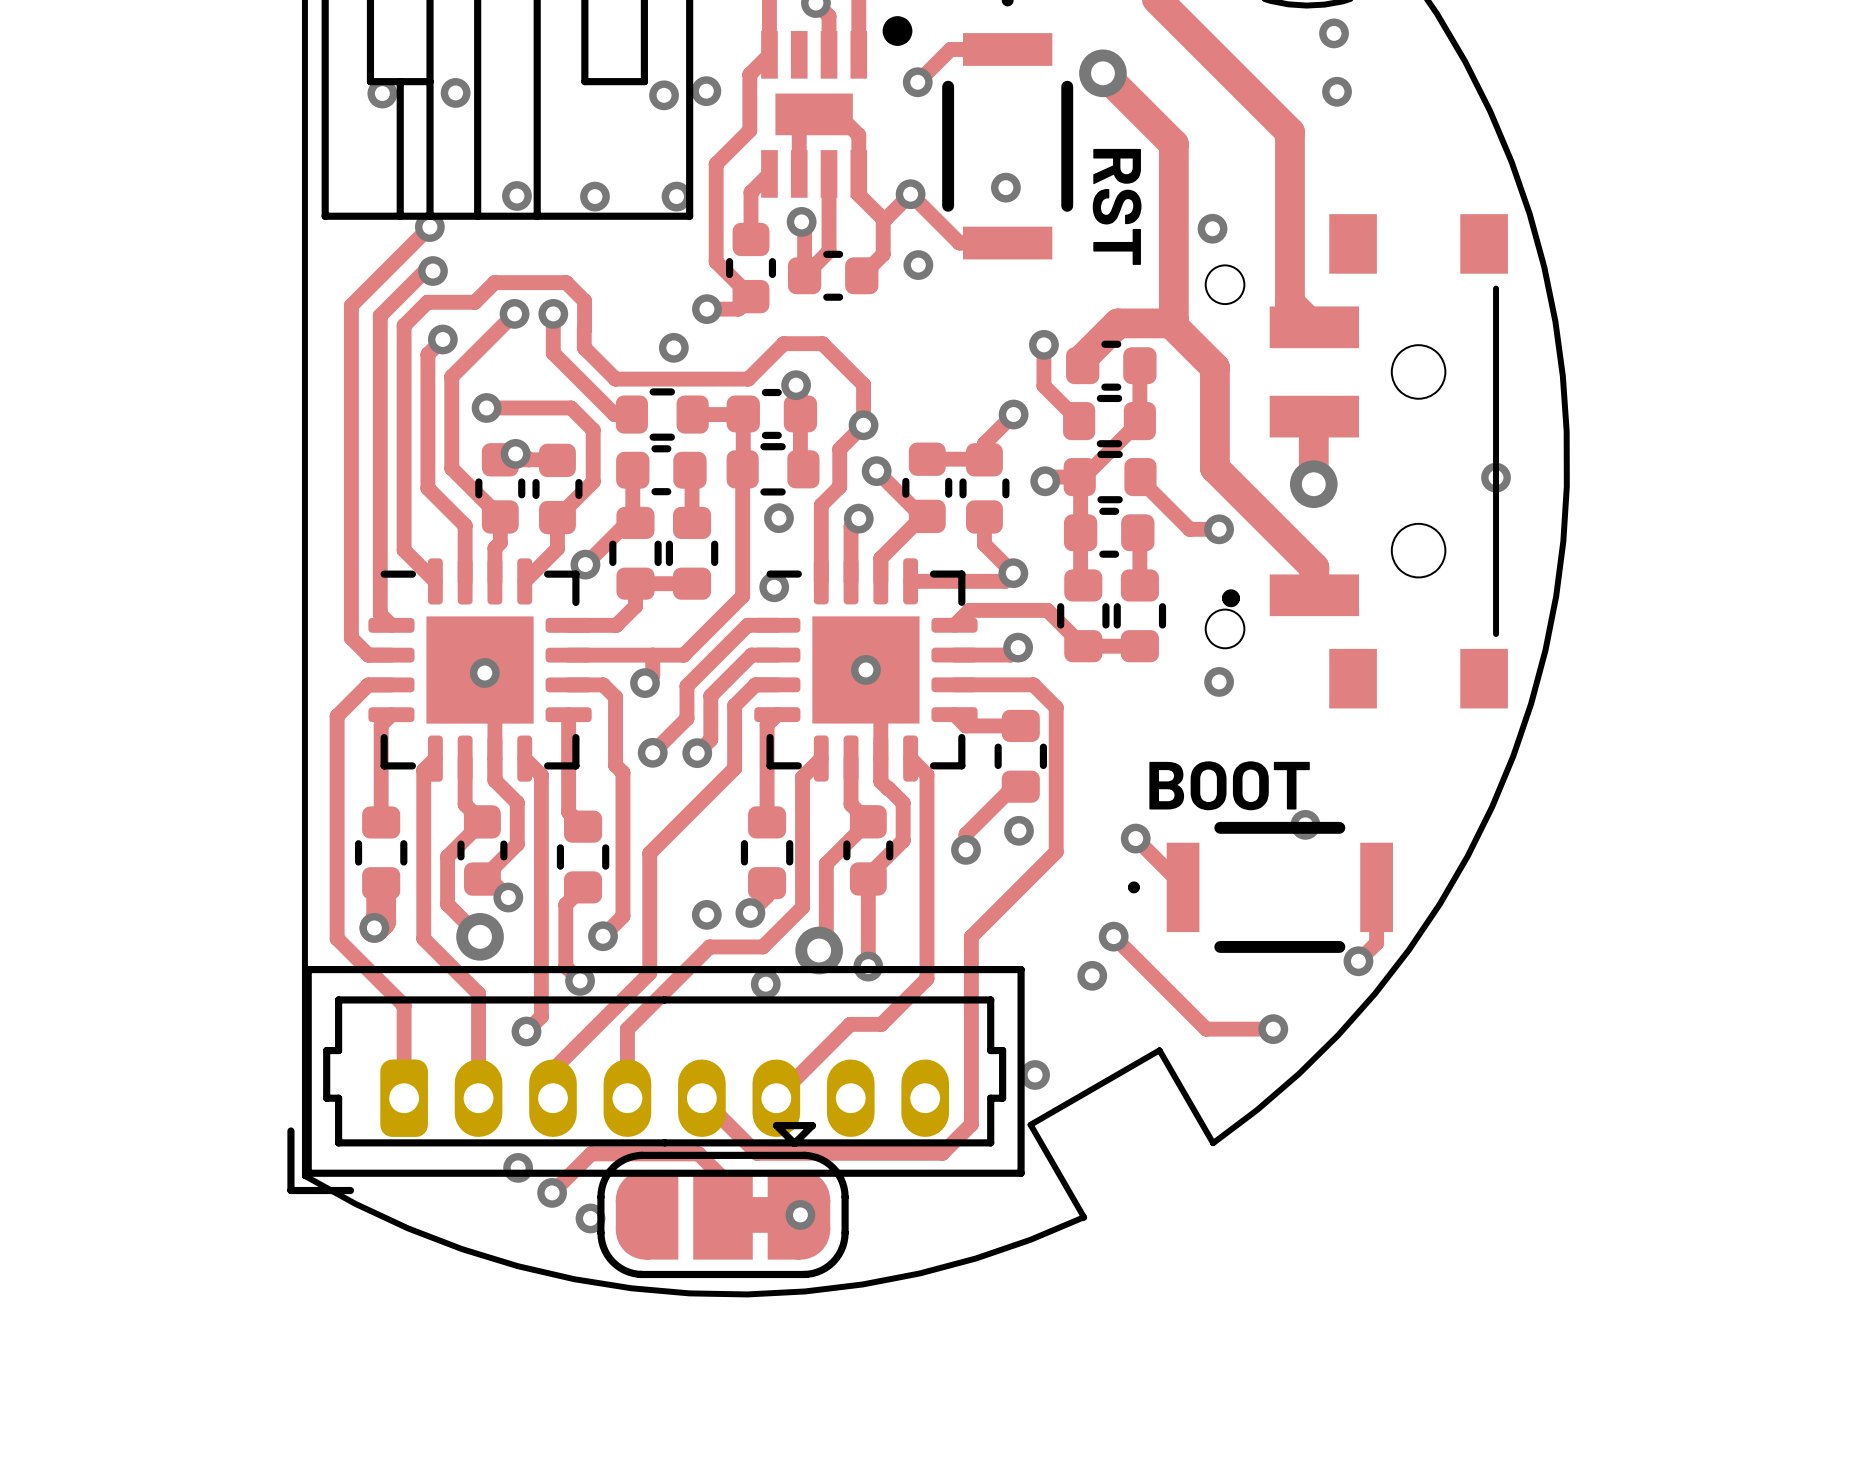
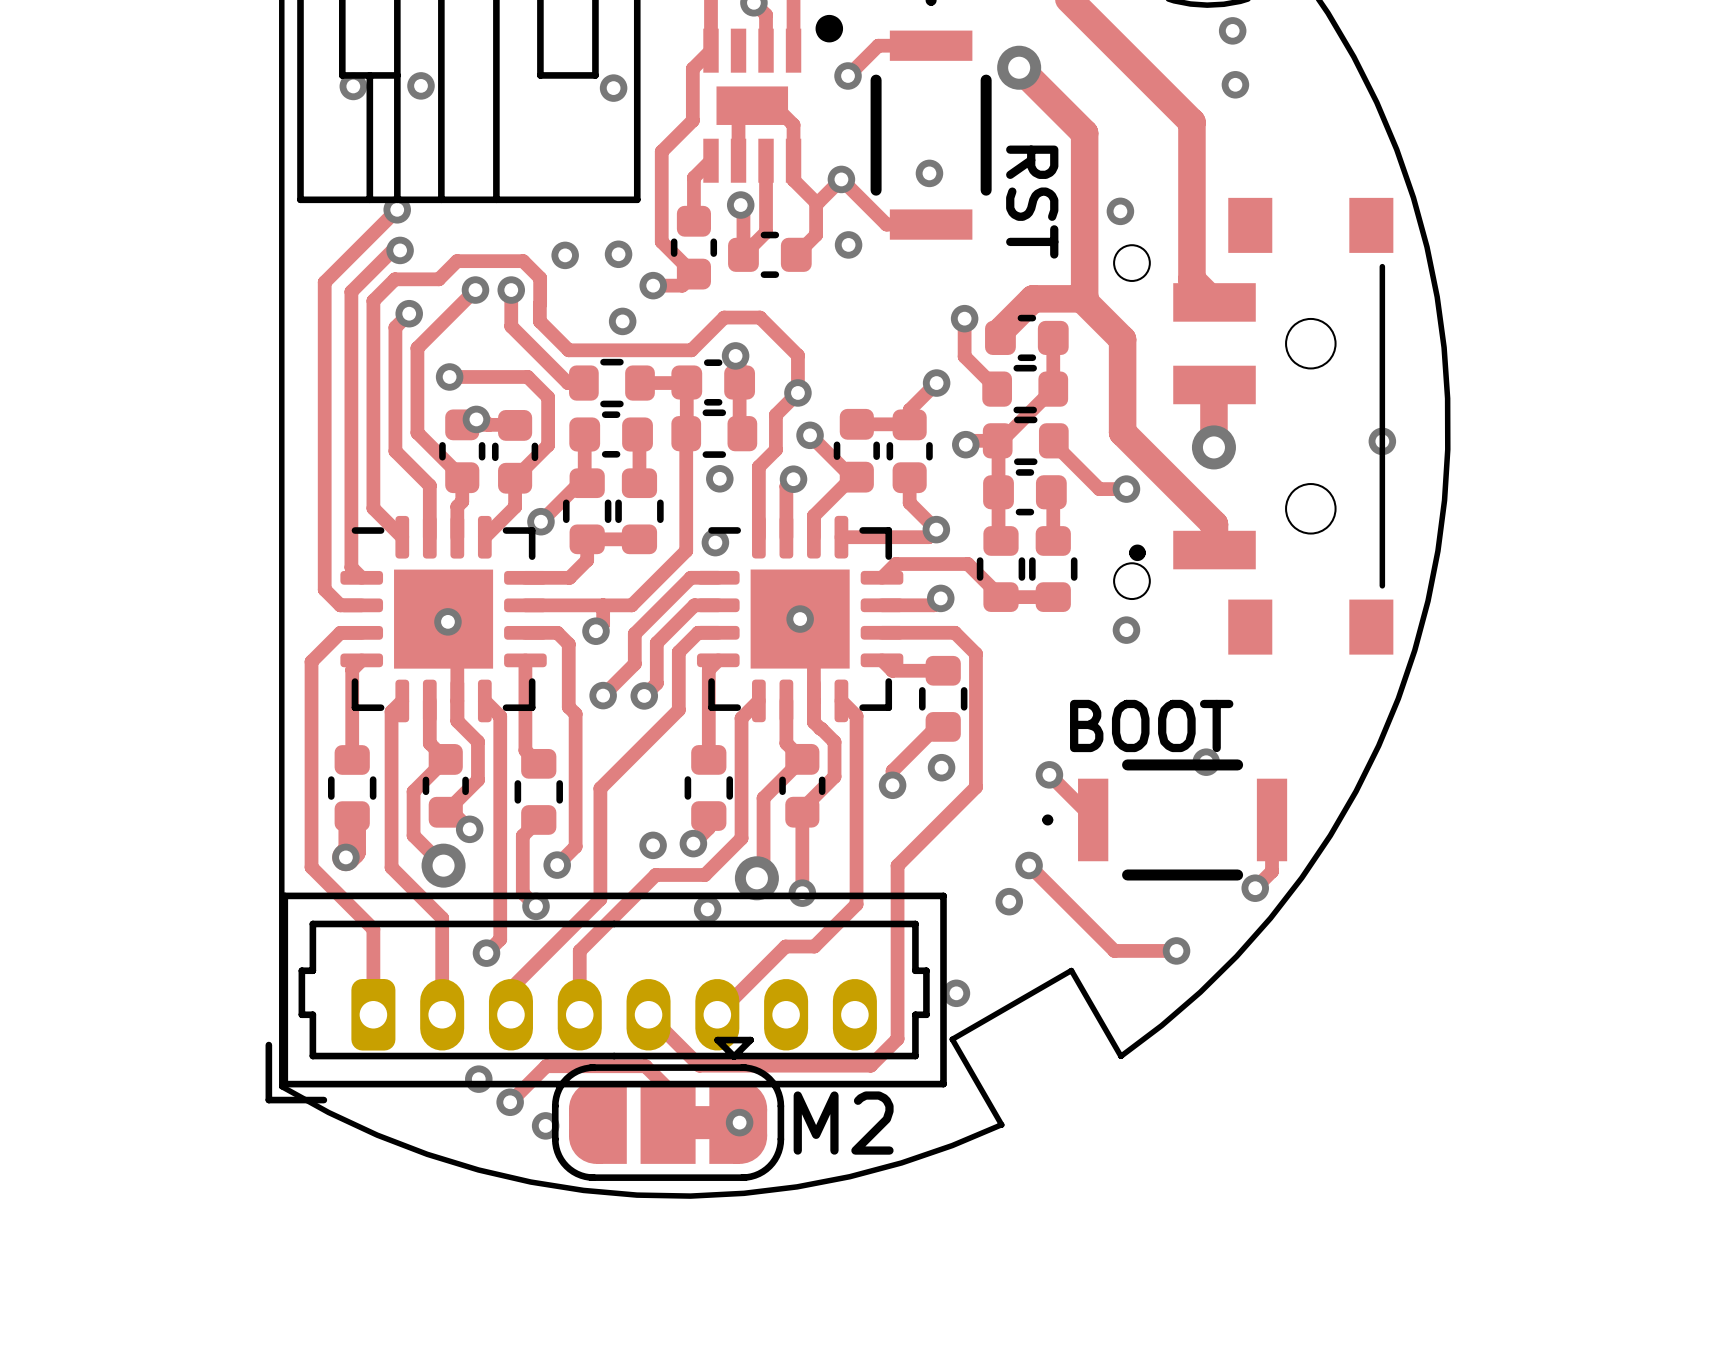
via: (706, 91) -> none
via: (516, 195) -> none
via: (594, 196) -> none
via: (676, 196) -> none
via: none -> (618, 254)
via: none -> (565, 255)
text: none -> M2 (843, 1123)

